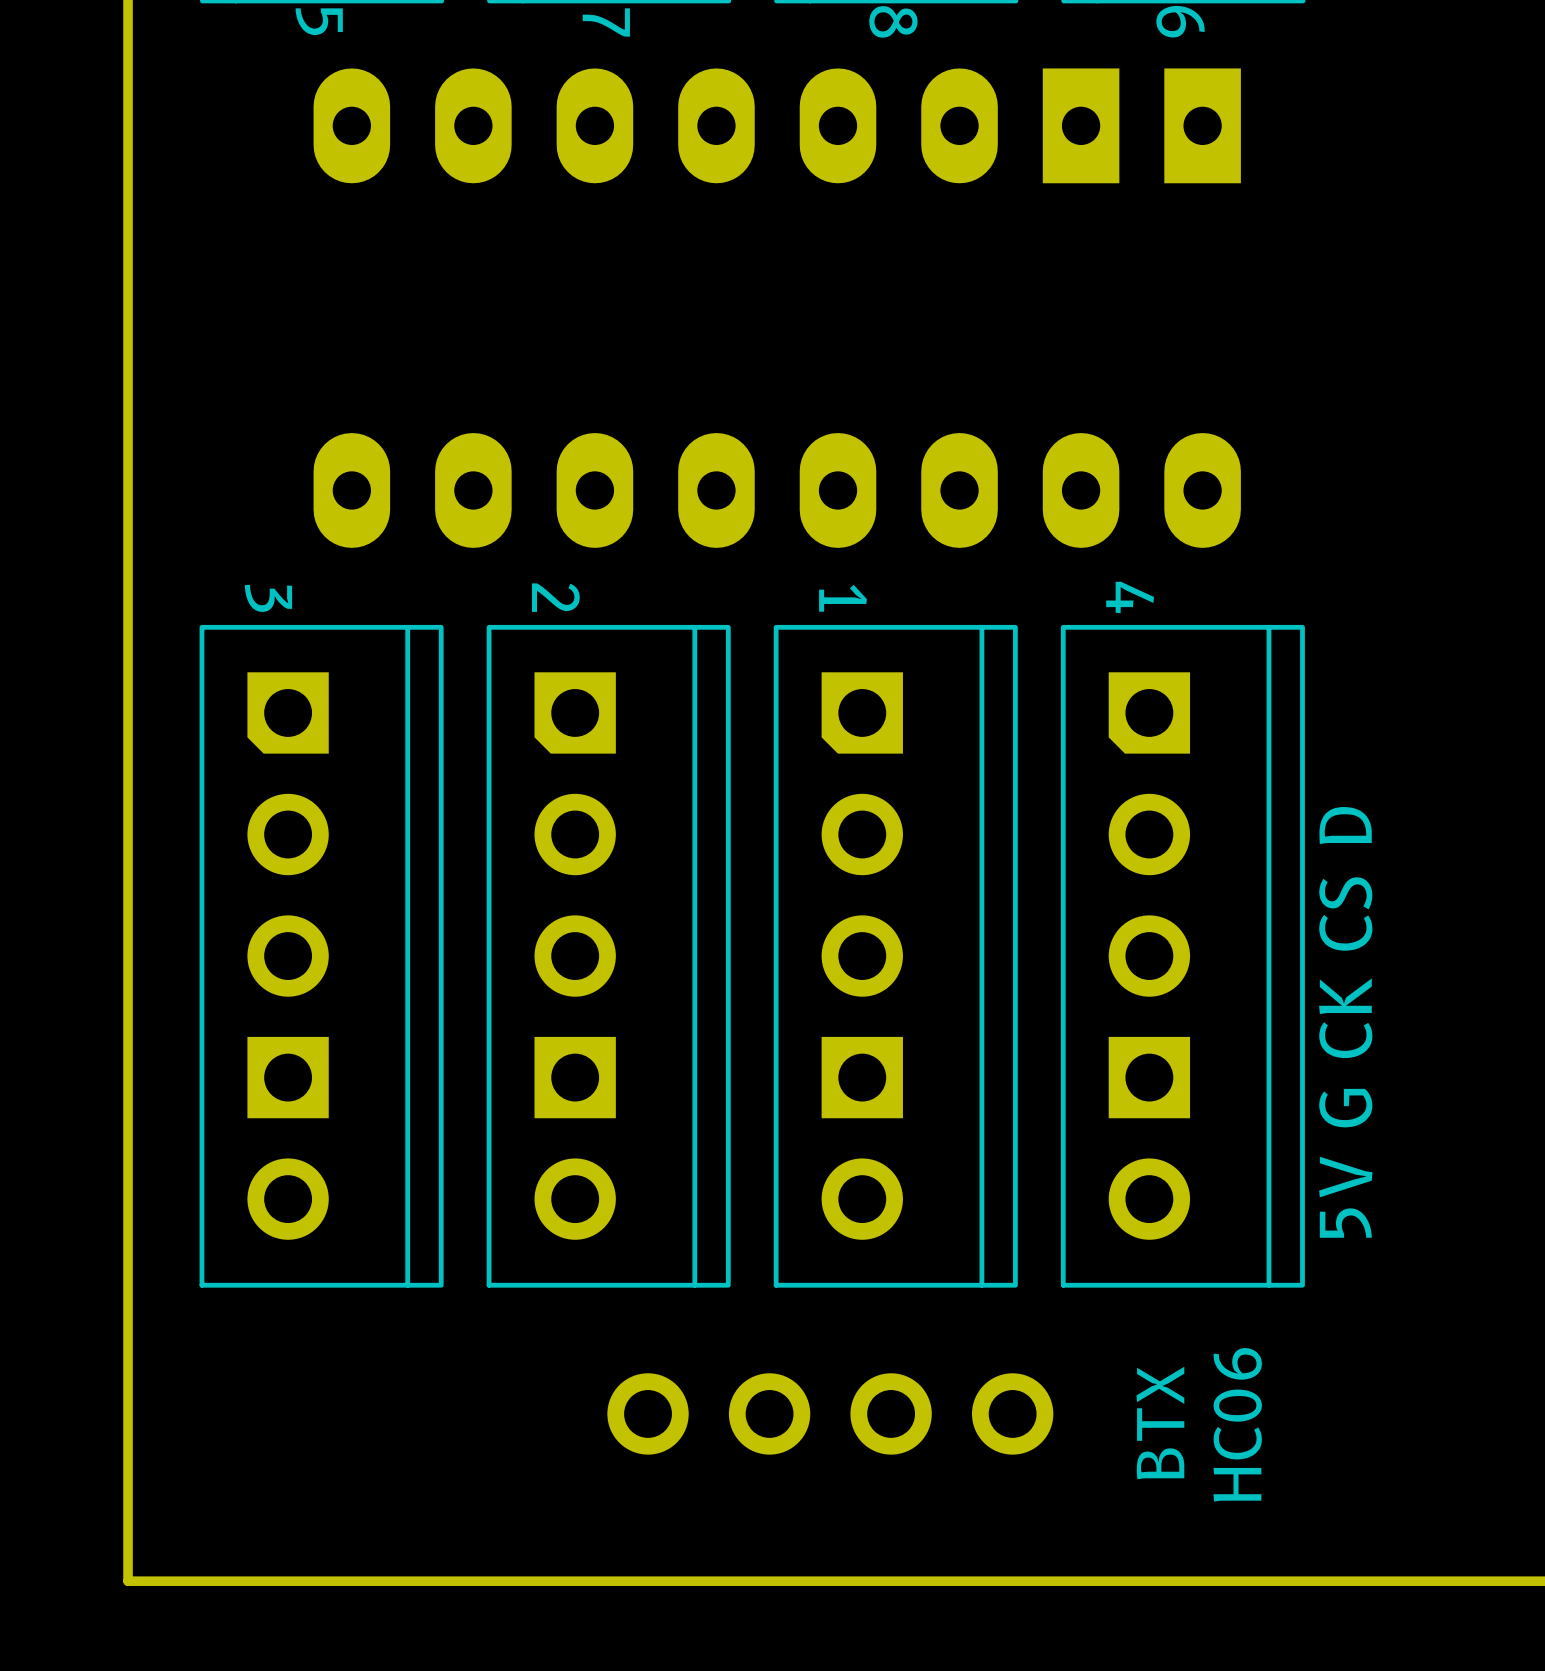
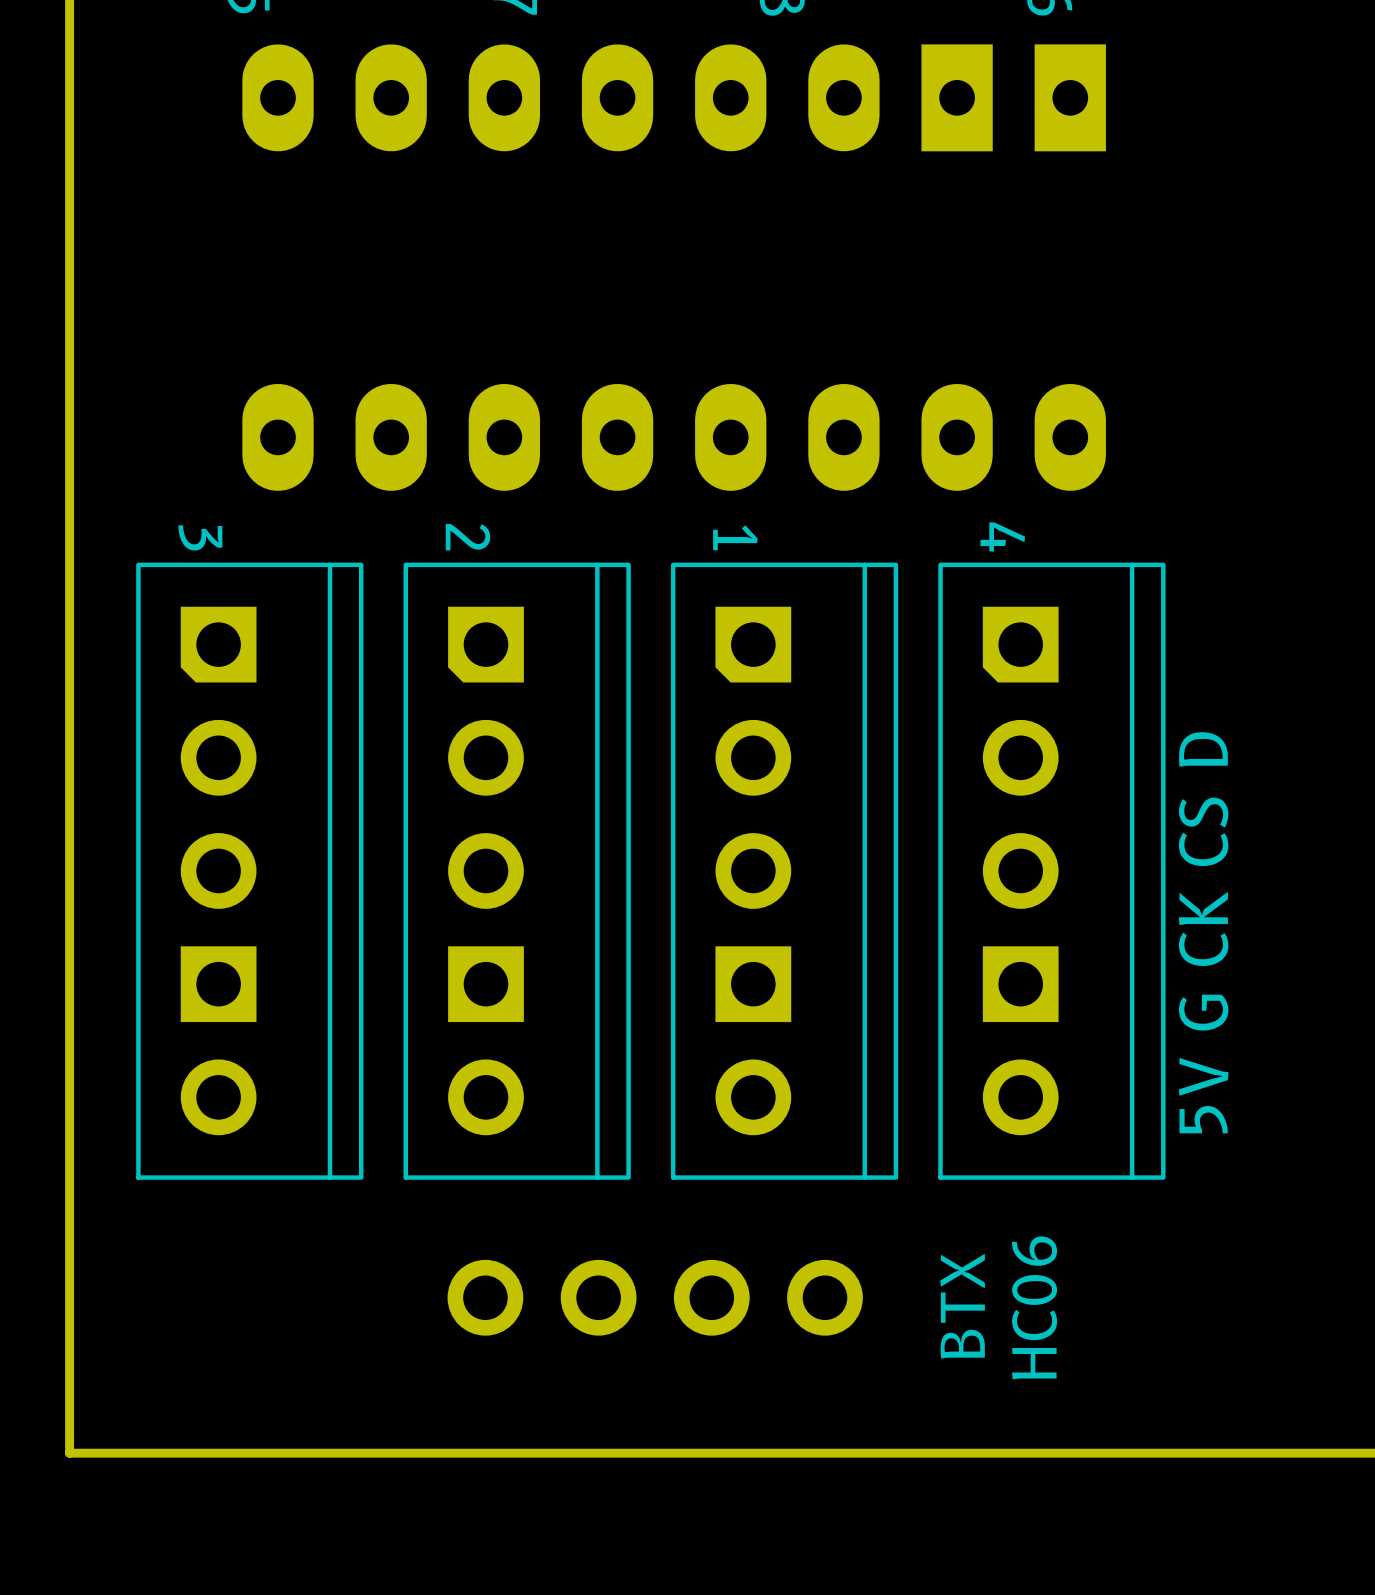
part position: (830, 1413) -> (655, 1297)
text: none -> BTX (962, 1306)
text: BTX (1160, 1423) -> HC06 (1034, 1307)
text: HC06 (1237, 1424) -> none

